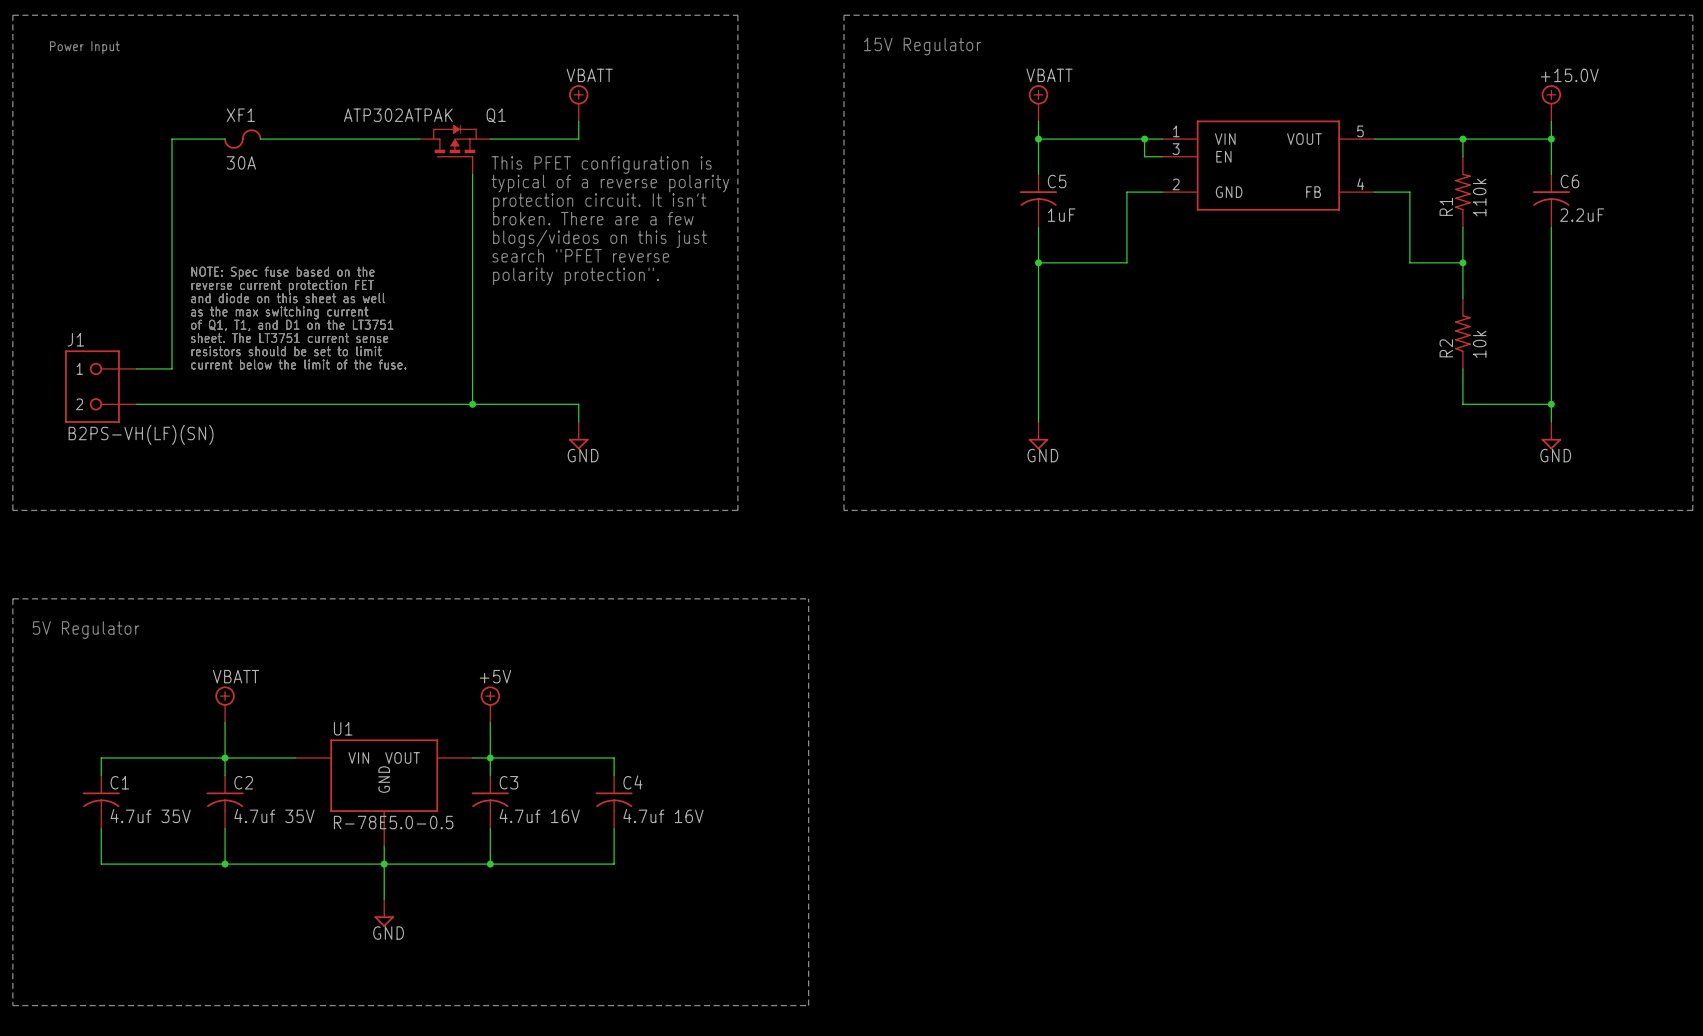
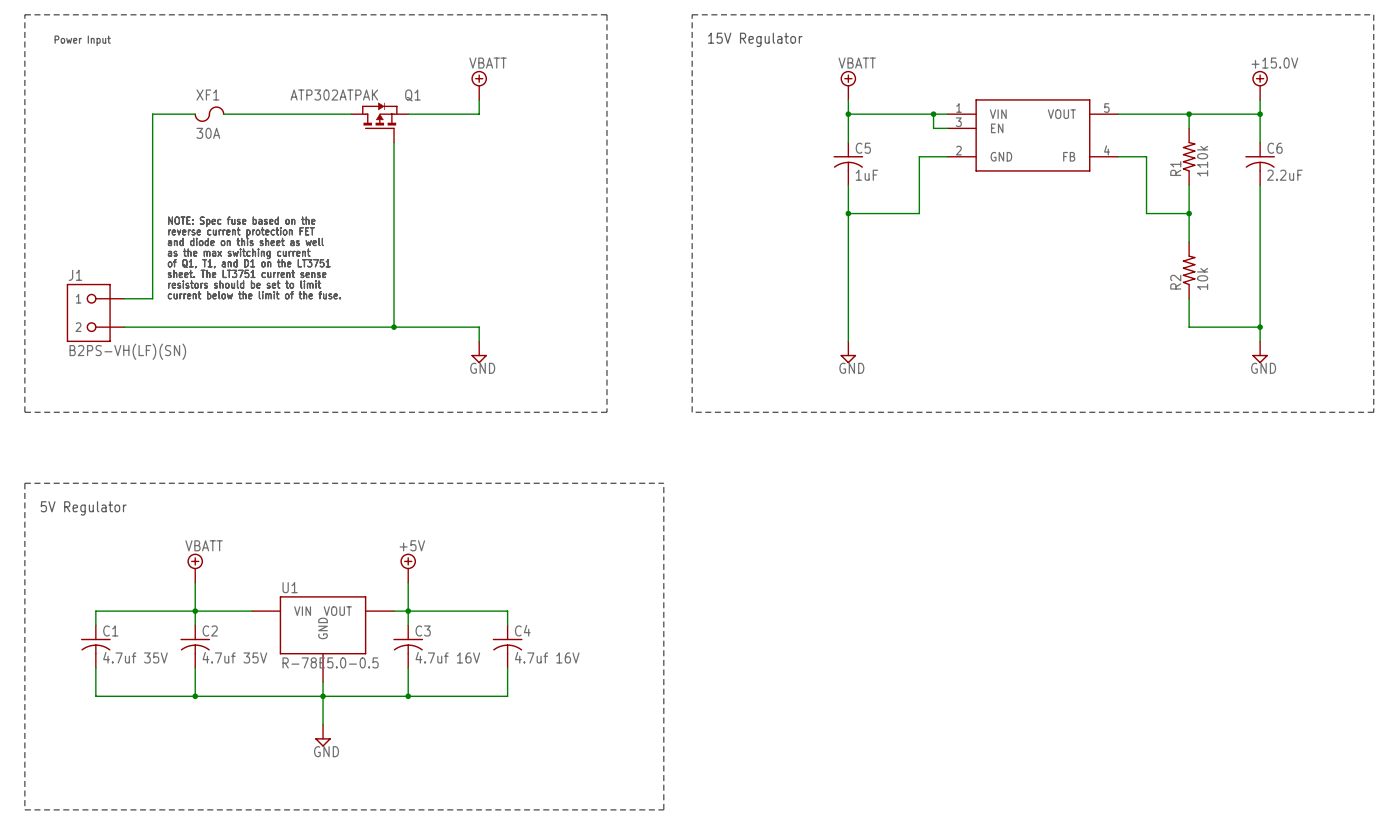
text: This PFET configuration is (601, 164) -> none
text: typical of a reverse polarity (610, 183) -> none
text: protection circuit. It isn't (599, 202) -> none
text: broken. There are a few (593, 218) -> none
text: blogs/videos on this just (599, 238) -> none
text: search "PFET reverse (580, 255) -> none
text: polarity protection". (576, 276) -> none

